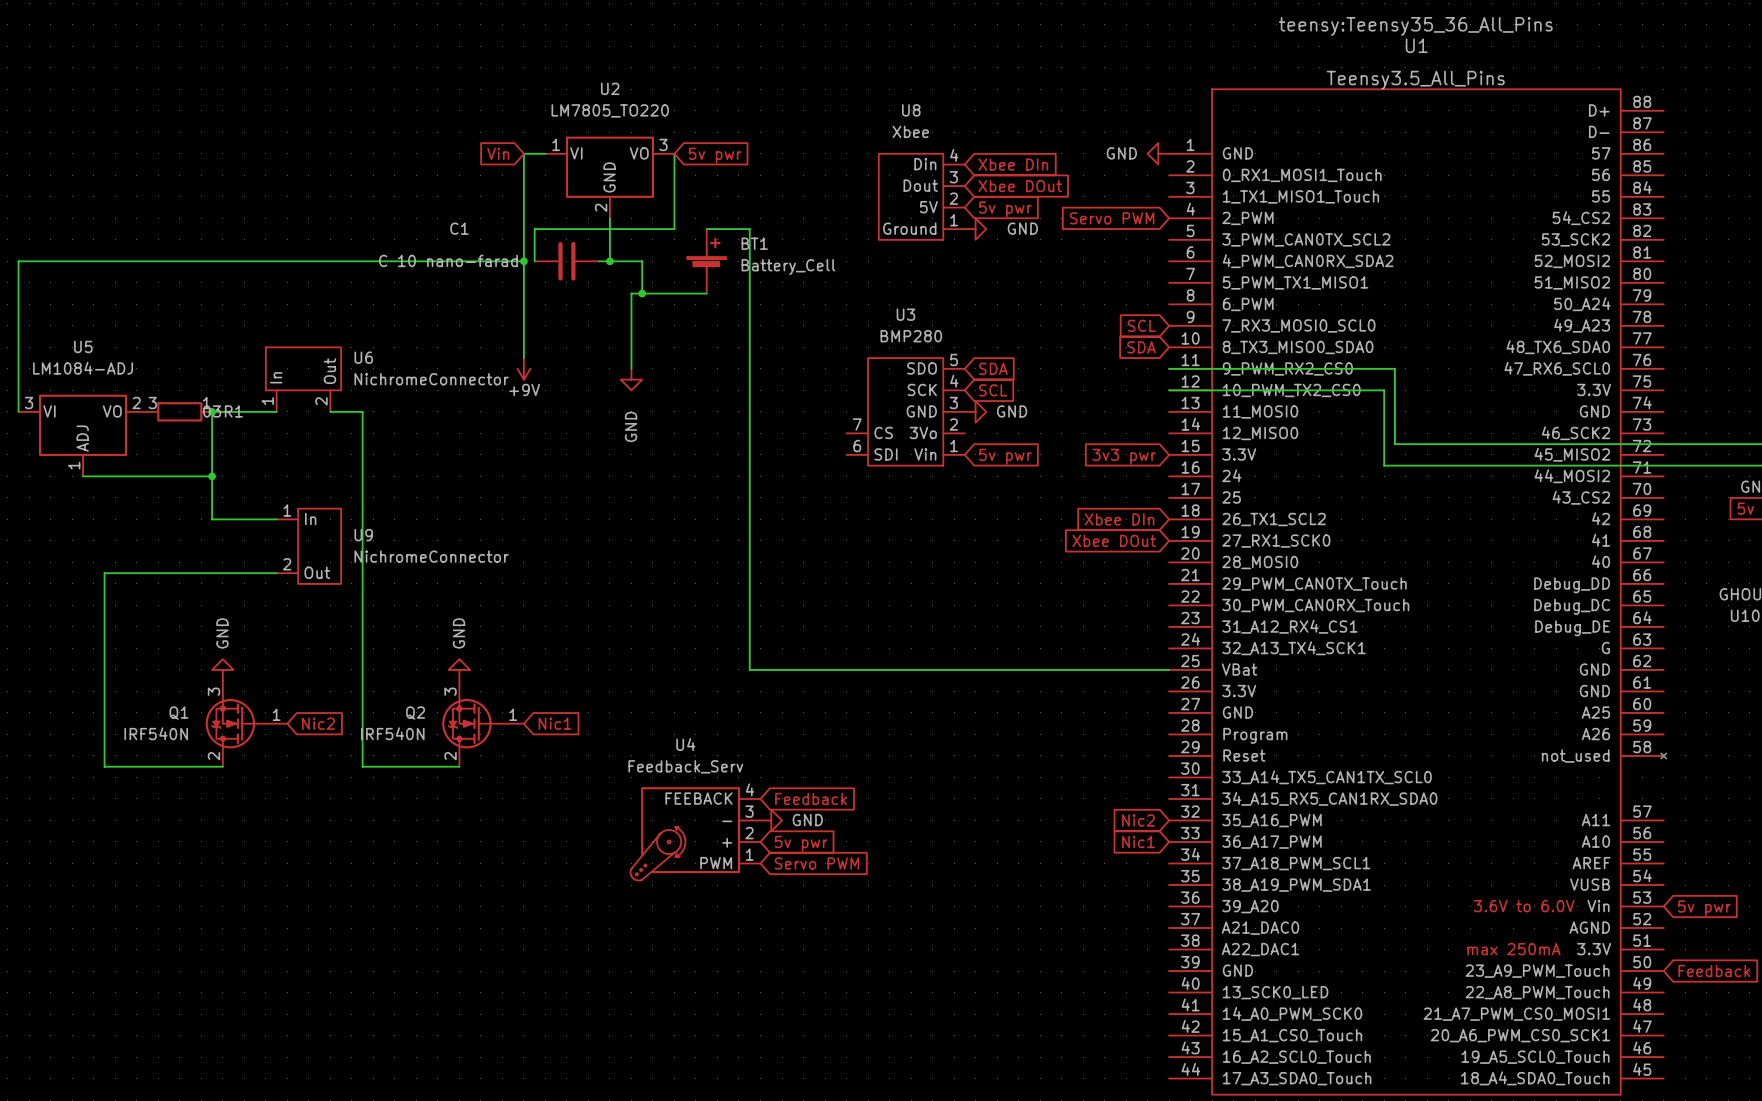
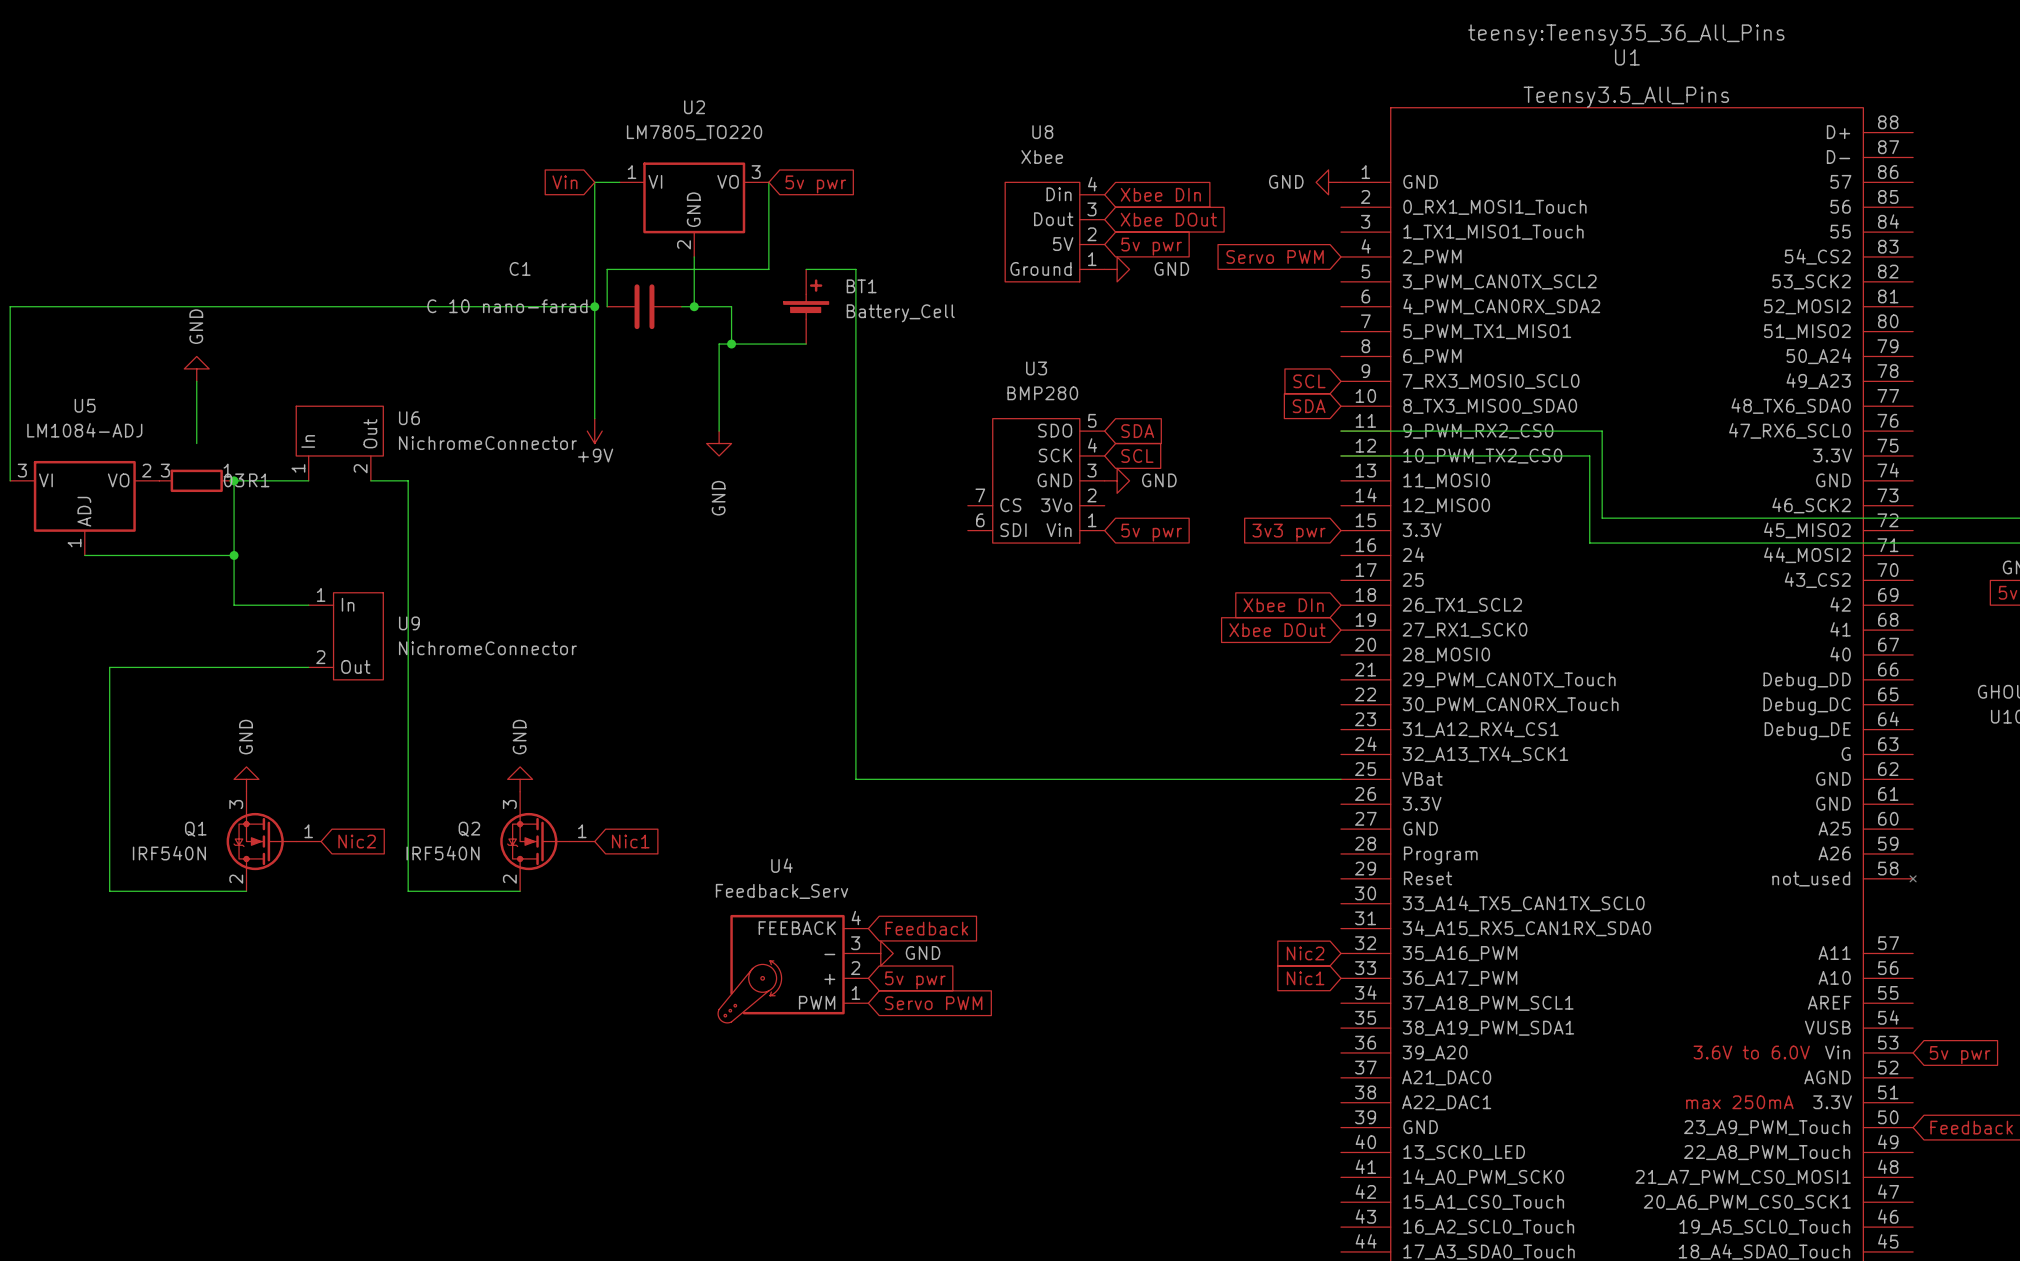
power symbol: none -> GND (196, 368)
wire: none -> (196, 381) (196, 443)

